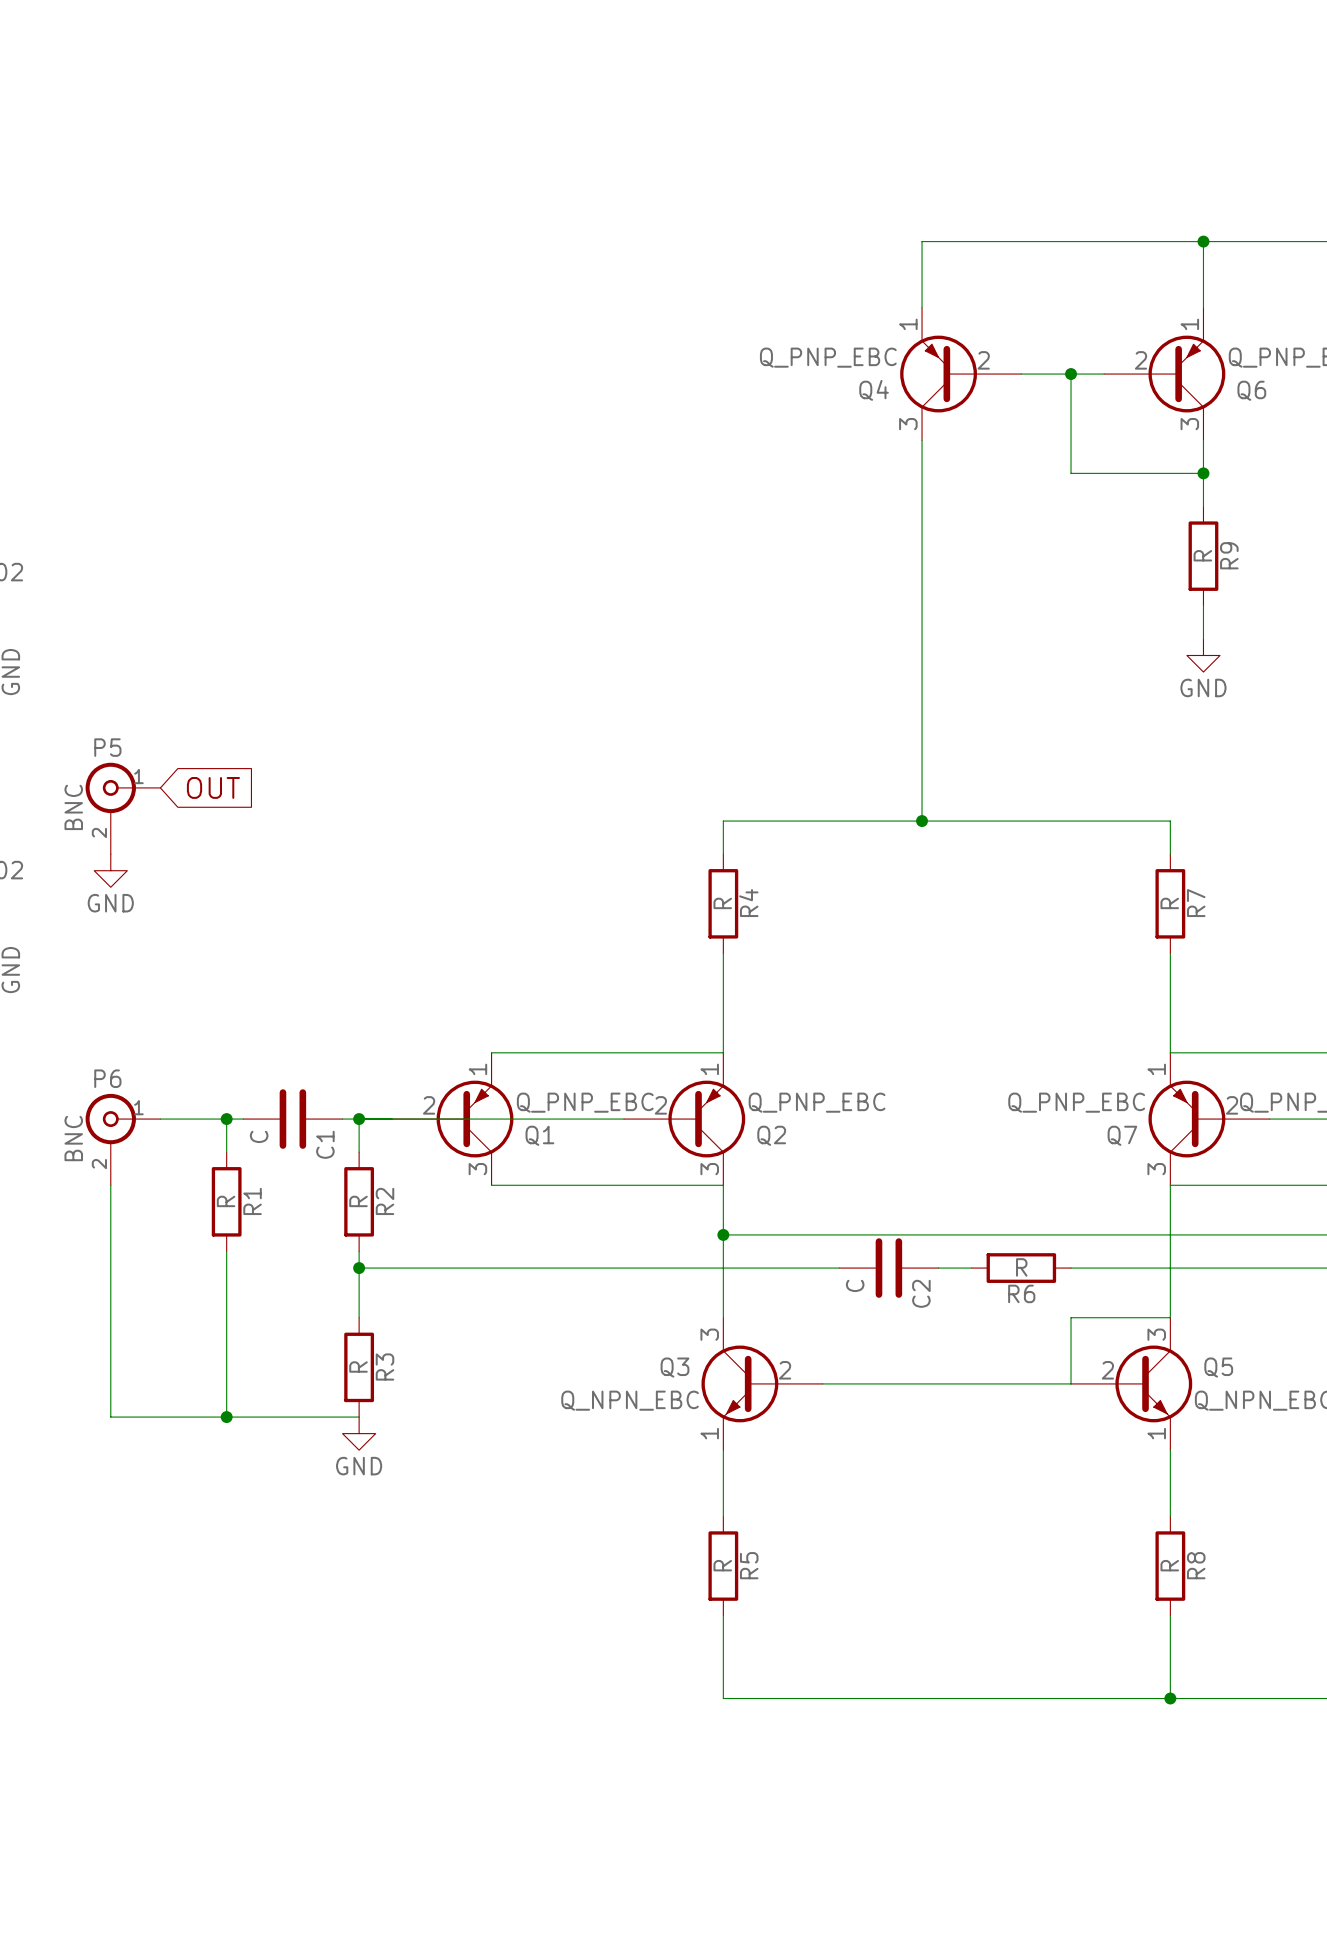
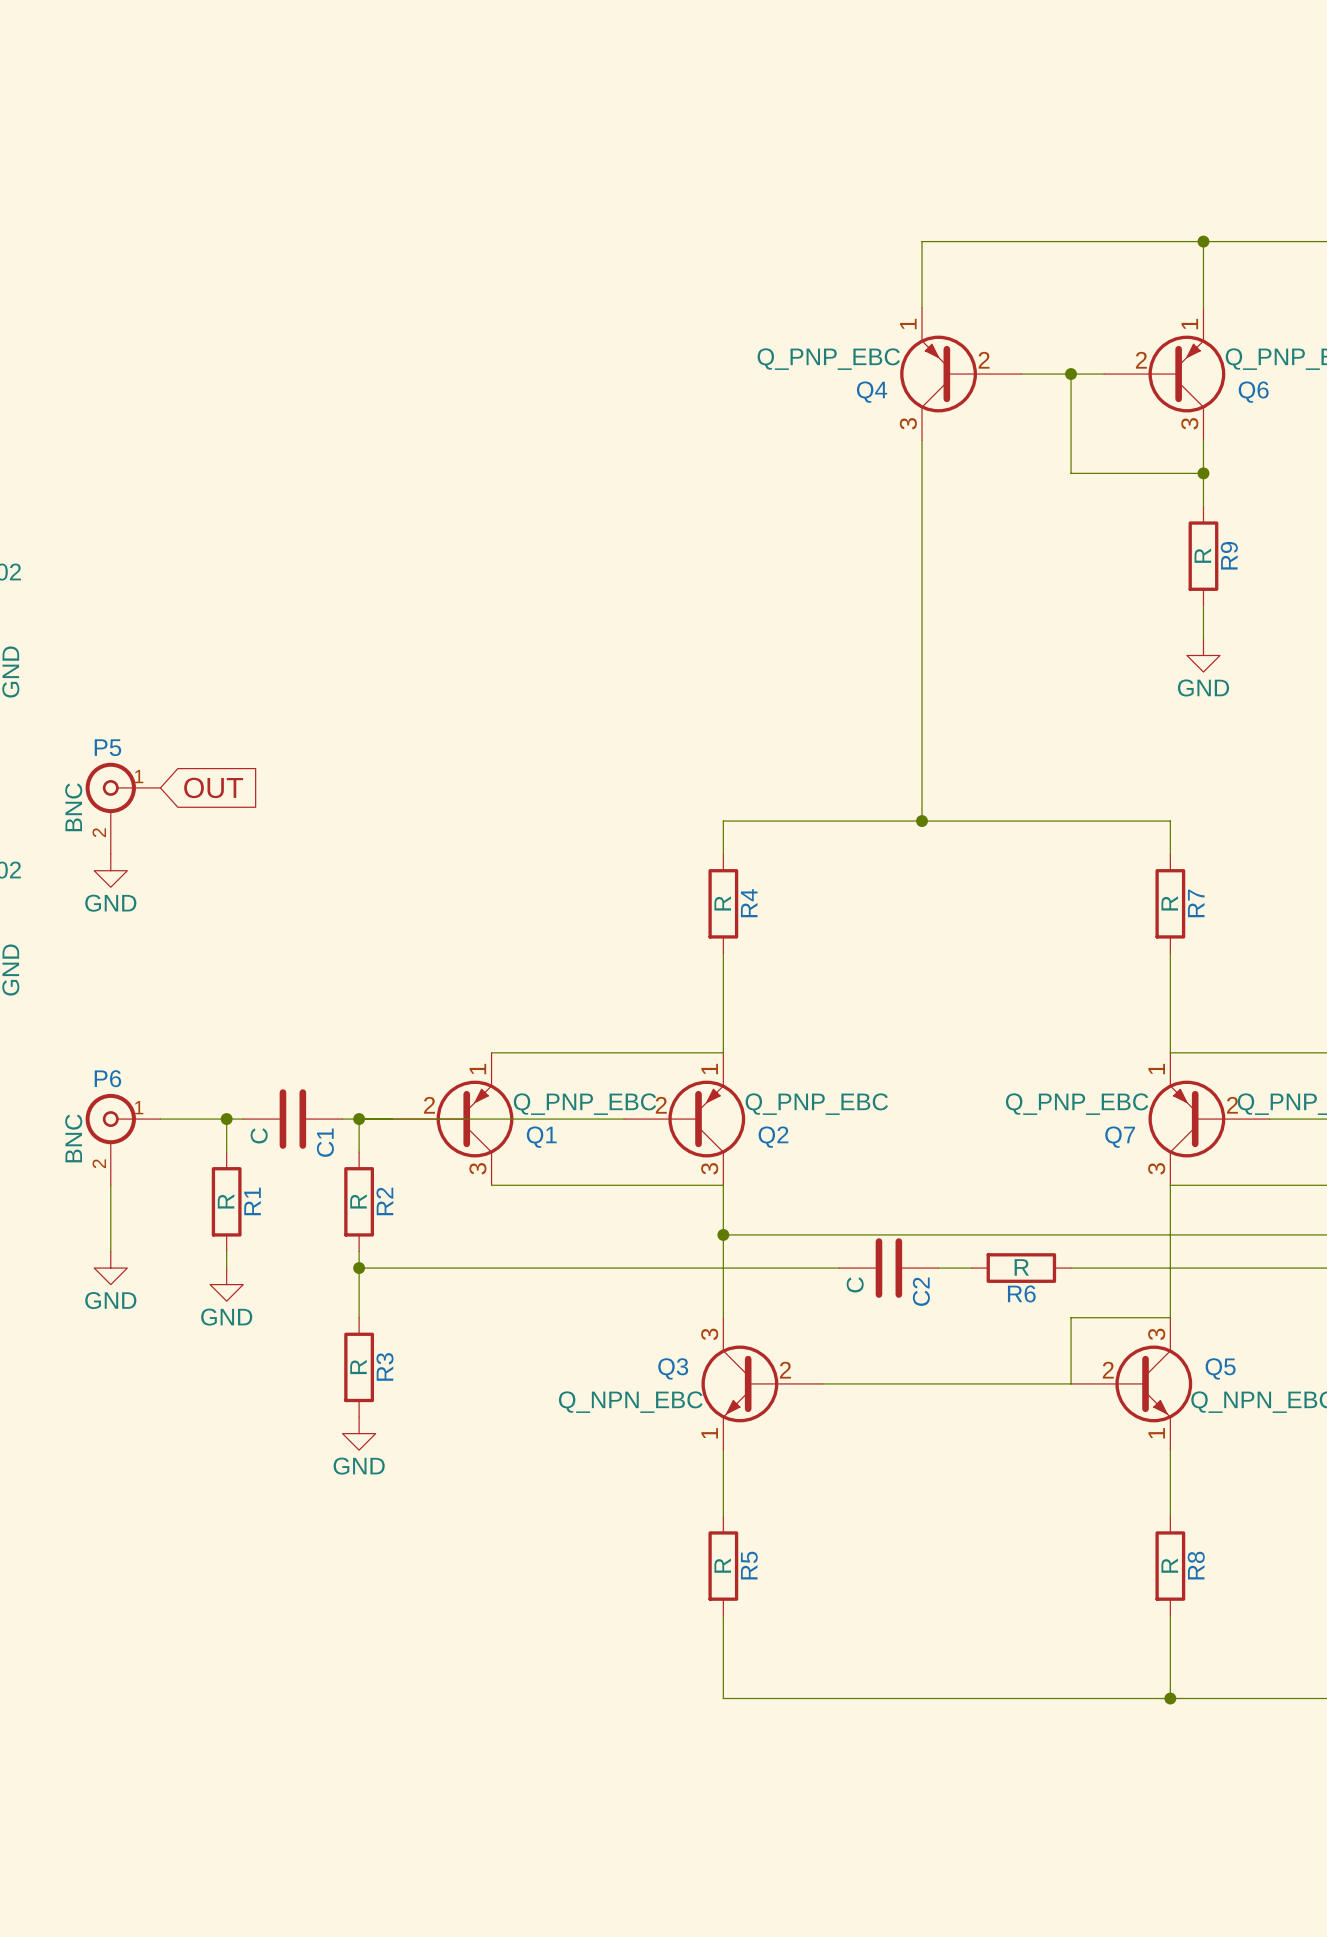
wire: (110, 1251) (110, 1417) (359, 1417) -> none
power symbol: none -> GND (110, 1268)
wire: (226, 1268) (226, 1417) -> none
power symbol: none -> GND (226, 1284)
junction: (226, 1417) -> none

